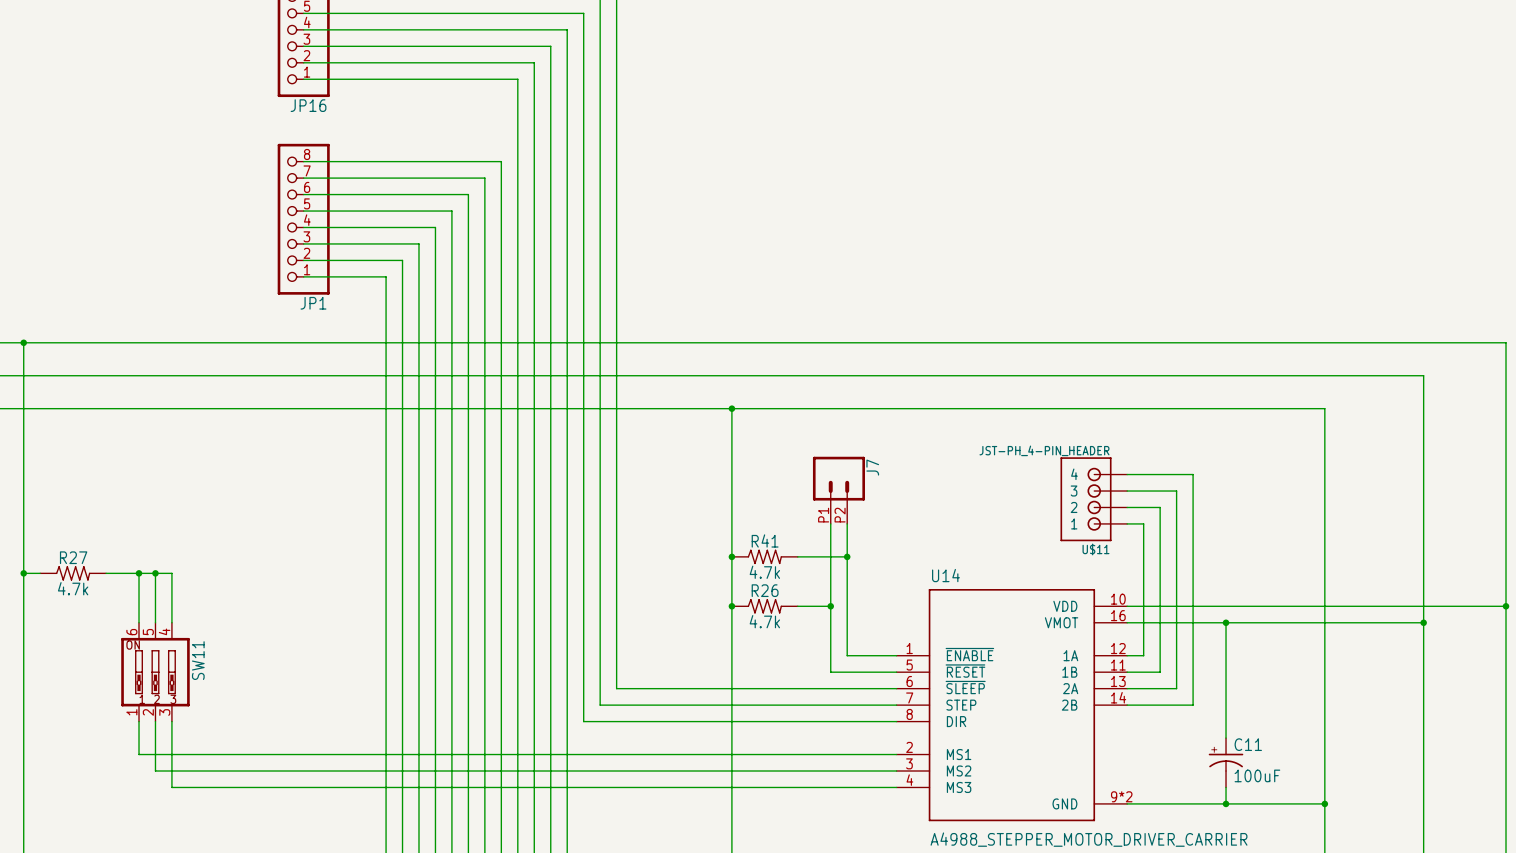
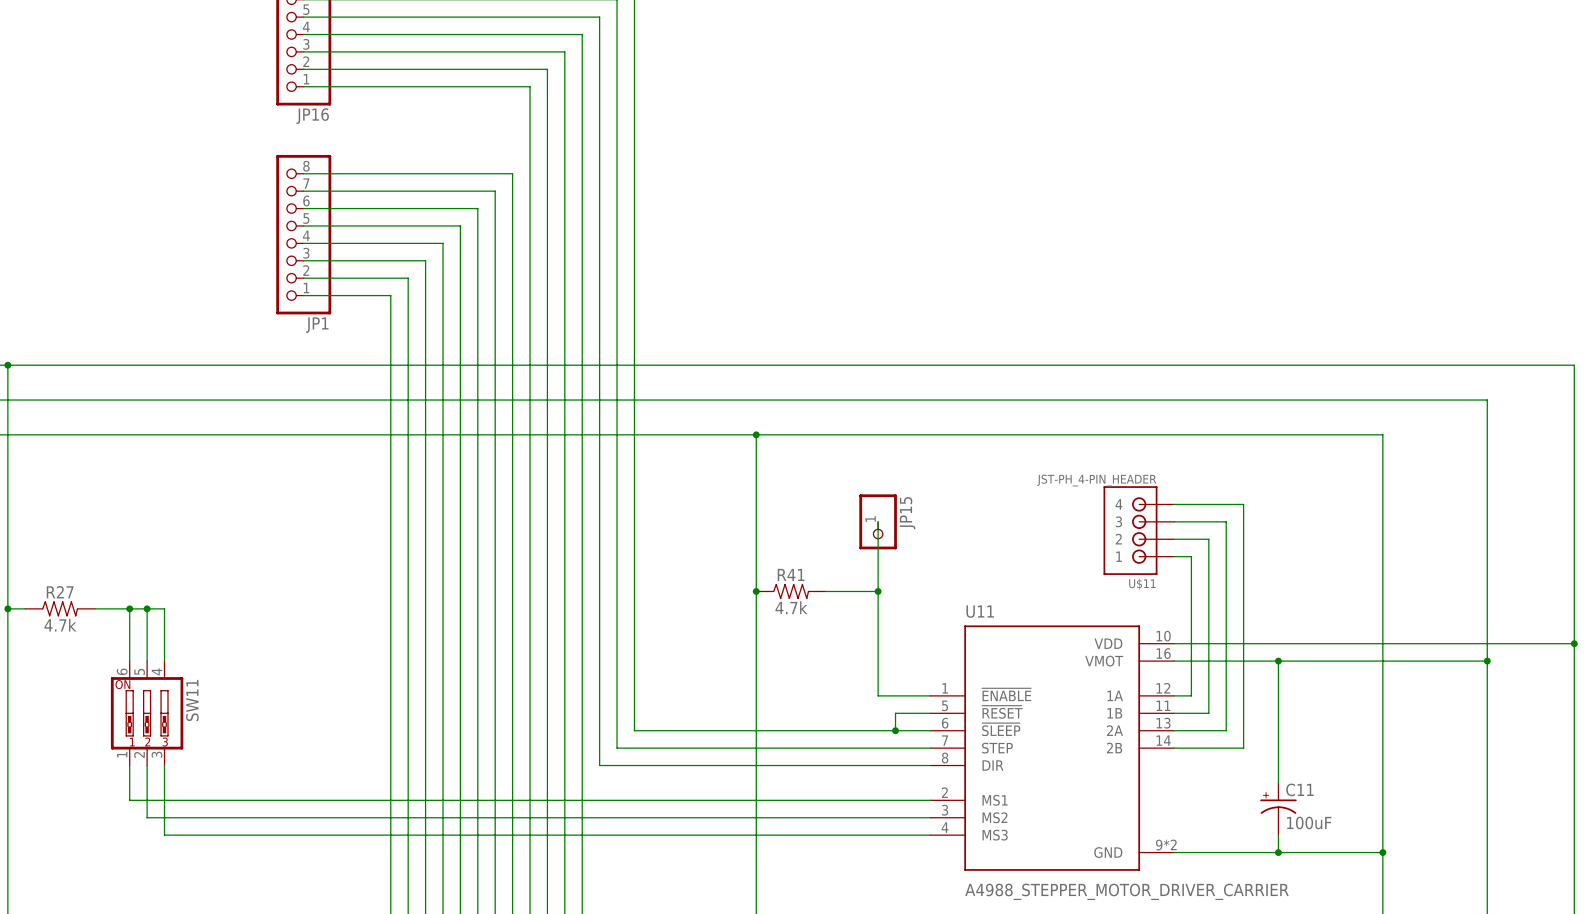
J7: (838, 490) -> none
JP15: none -> (878, 521)
wire: (830, 523) (830, 672) (863, 672) -> (895, 730) (895, 713)
U14 name: U14 (945, 575) -> U11 (980, 611)
junction: (731, 606) -> none
R26: 4.7k (764, 606) -> none
wire: (797, 606) (830, 606) -> none
junction: (830, 606) -> none
junction: none -> (895, 730)

